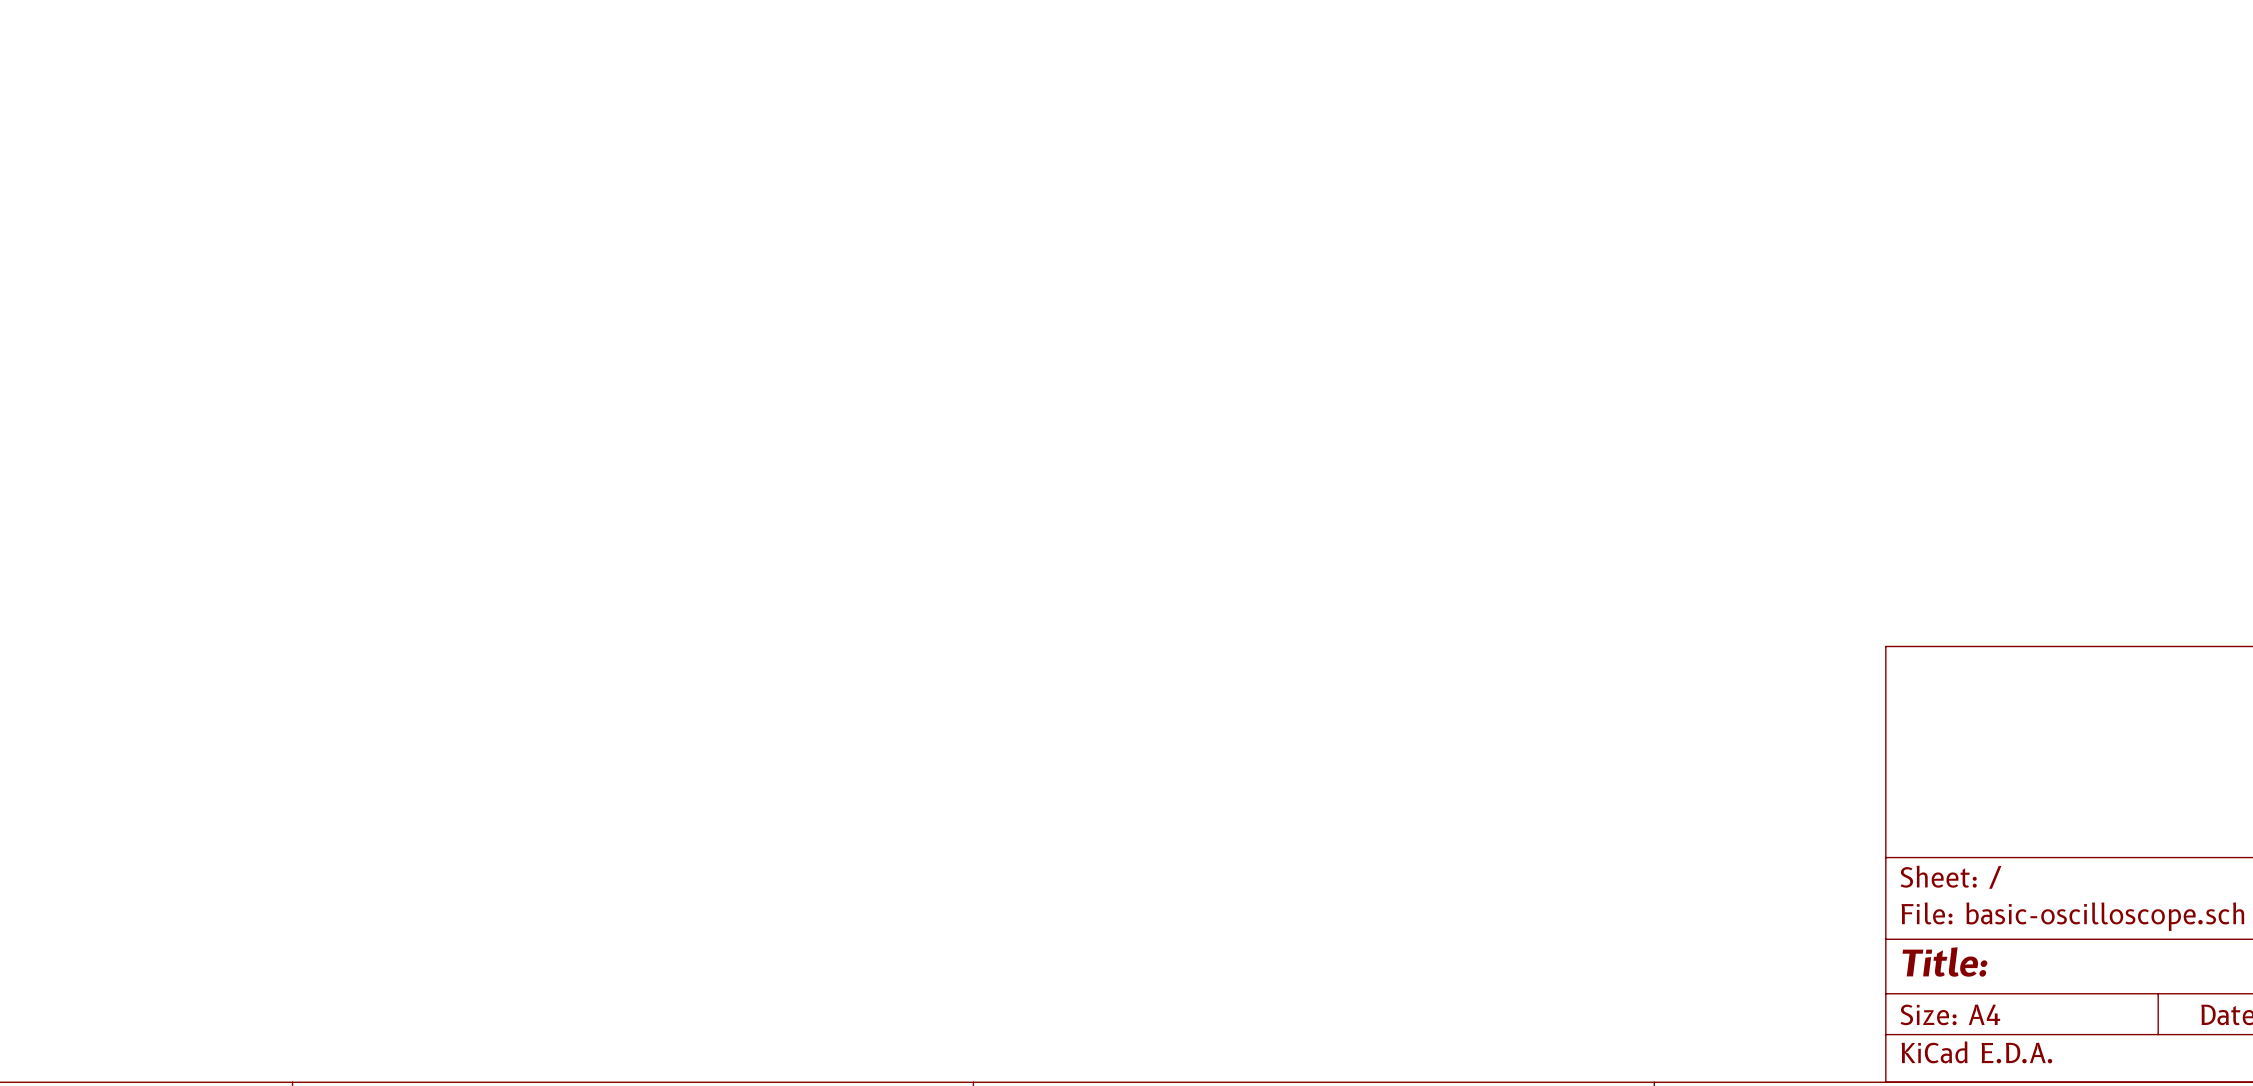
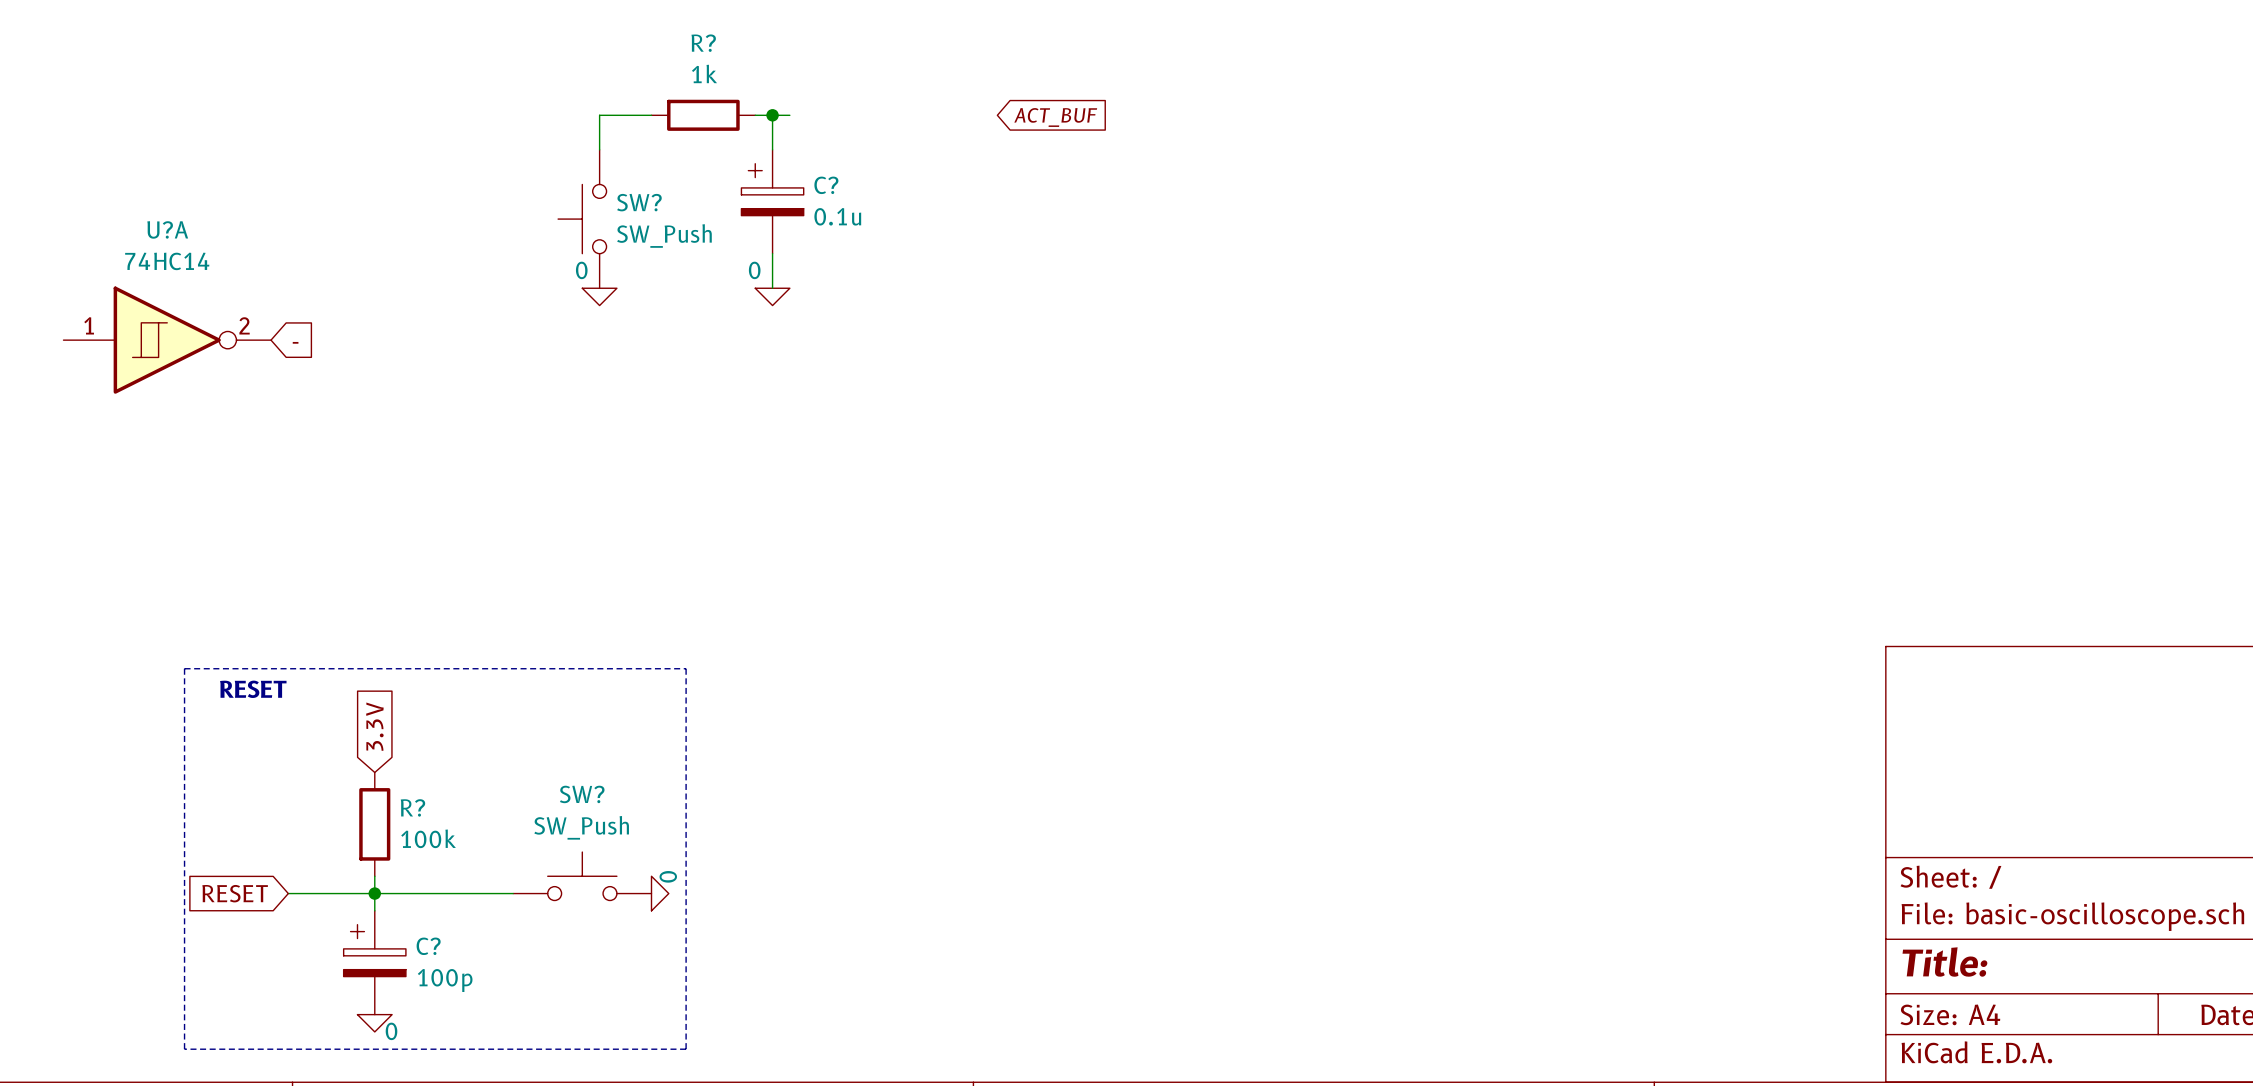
wire: none -> (651, 115) (599, 115) (599, 149)
R?: none -> 1k (703, 115)
wire: none -> (755, 115) (789, 115)
wire: none -> (772, 115) (772, 149)
junction: none -> (772, 115)
global label: none -> ACT_BUF (1055, 117)
C?: none -> 0.1u (772, 201)
SW?: none -> SW_Push (582, 219)
wire: none -> (772, 253) (772, 288)
power symbol: none -> 0 (599, 296)
power symbol: none -> 0 (772, 296)
U?A: none -> 74HC14 (167, 340)
global label: none -> - (295, 342)
line: none -> (184, 668) (686, 668) (686, 1049) (184, 1049) (184, 668)
text: none -> RESET (253, 689)
global label: none -> 3.3V (374, 726)
R?: none -> 100k (374, 824)
wire: none -> (374, 876) (374, 910)
SW?: none -> SW_Push (582, 876)
global label: none -> RESET (235, 893)
wire: none -> (288, 893) (513, 893)
junction: none -> (374, 893)
power symbol: none -> 0 (660, 893)
C?: none -> 100p (374, 962)
power symbol: none -> 0 (374, 1023)

